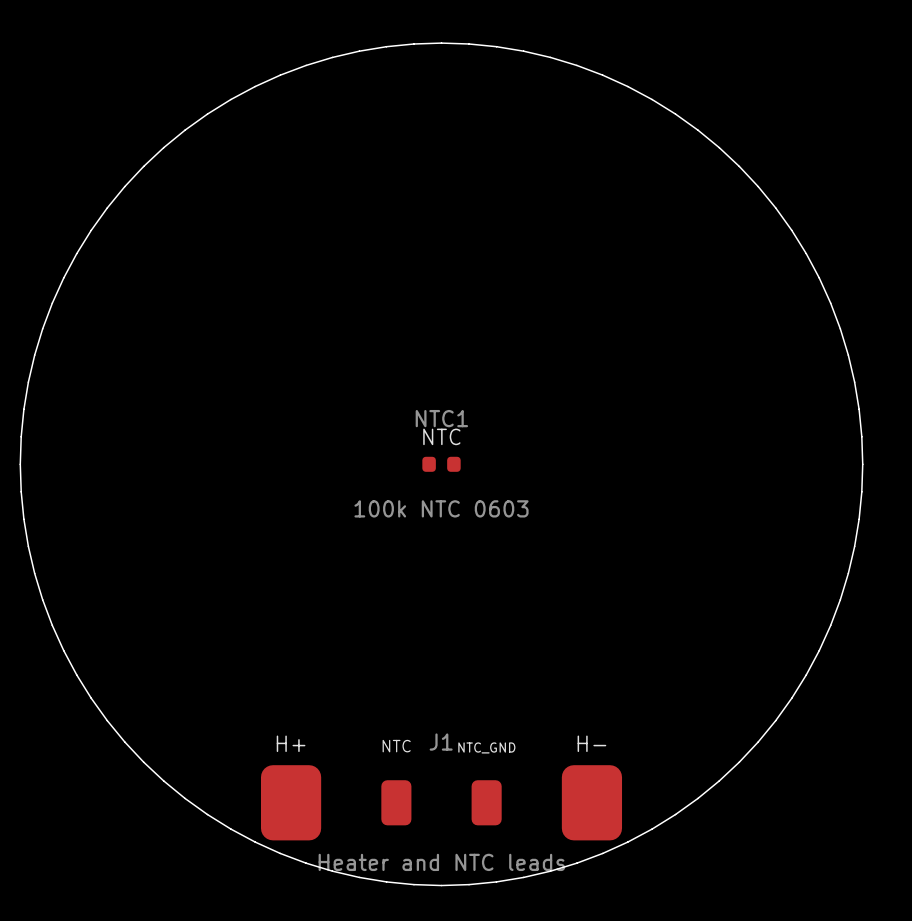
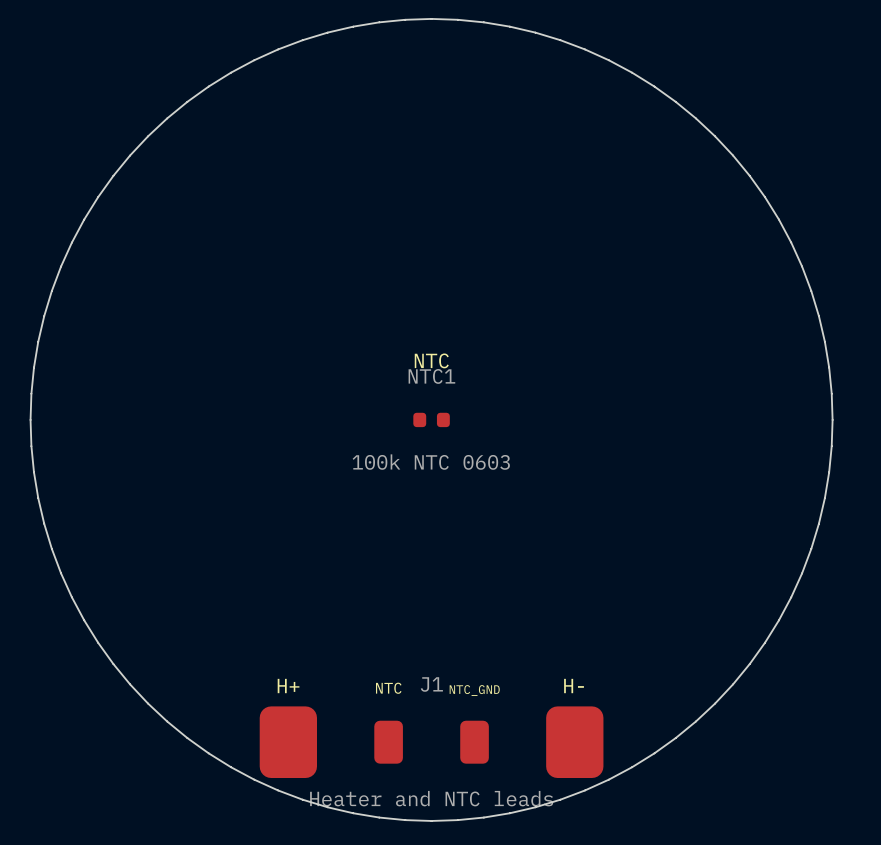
text position: NTC (441, 436) -> NTC (431, 360)

